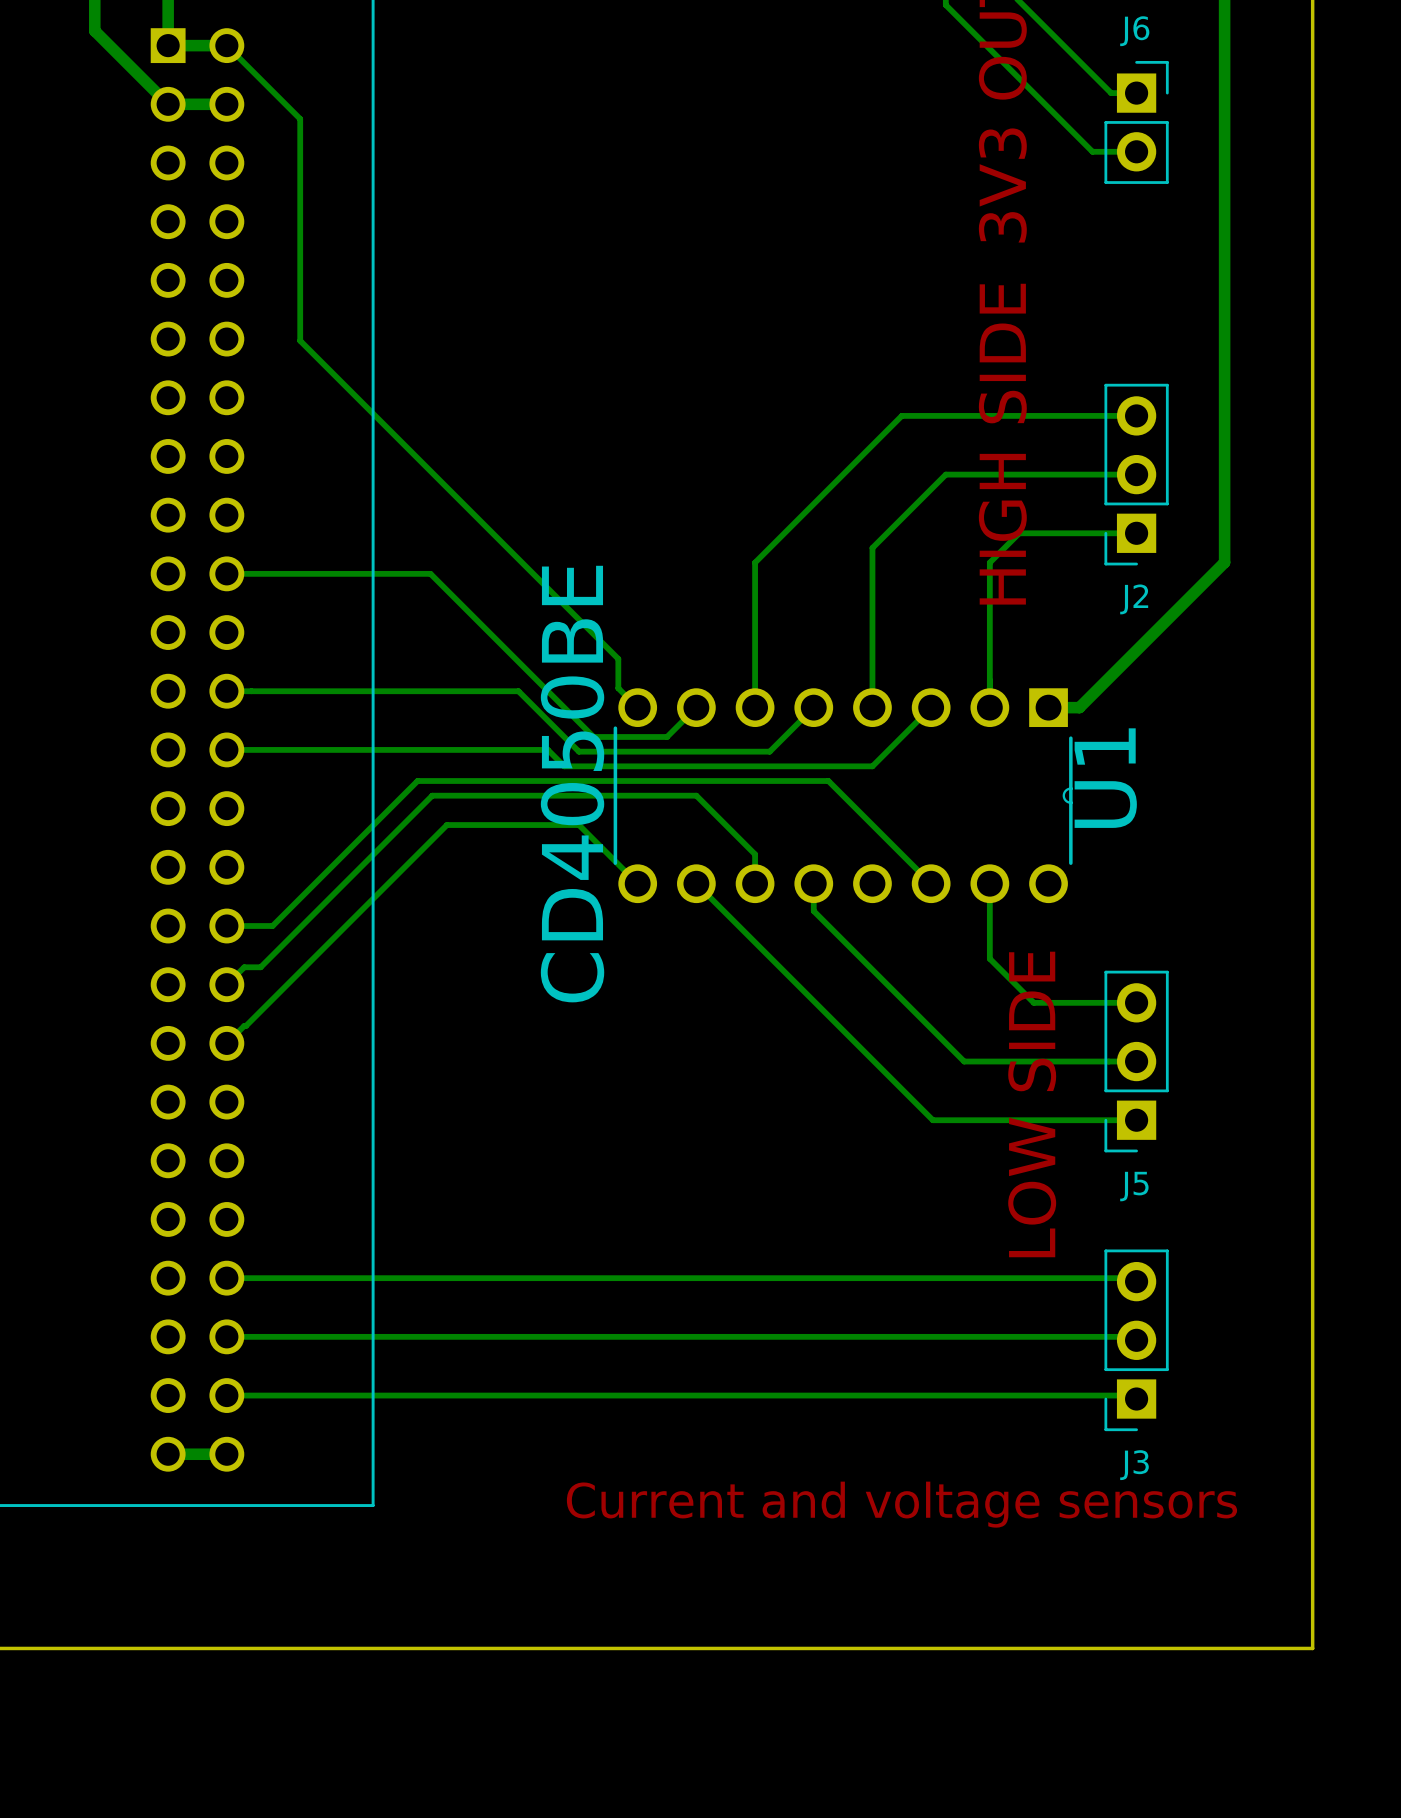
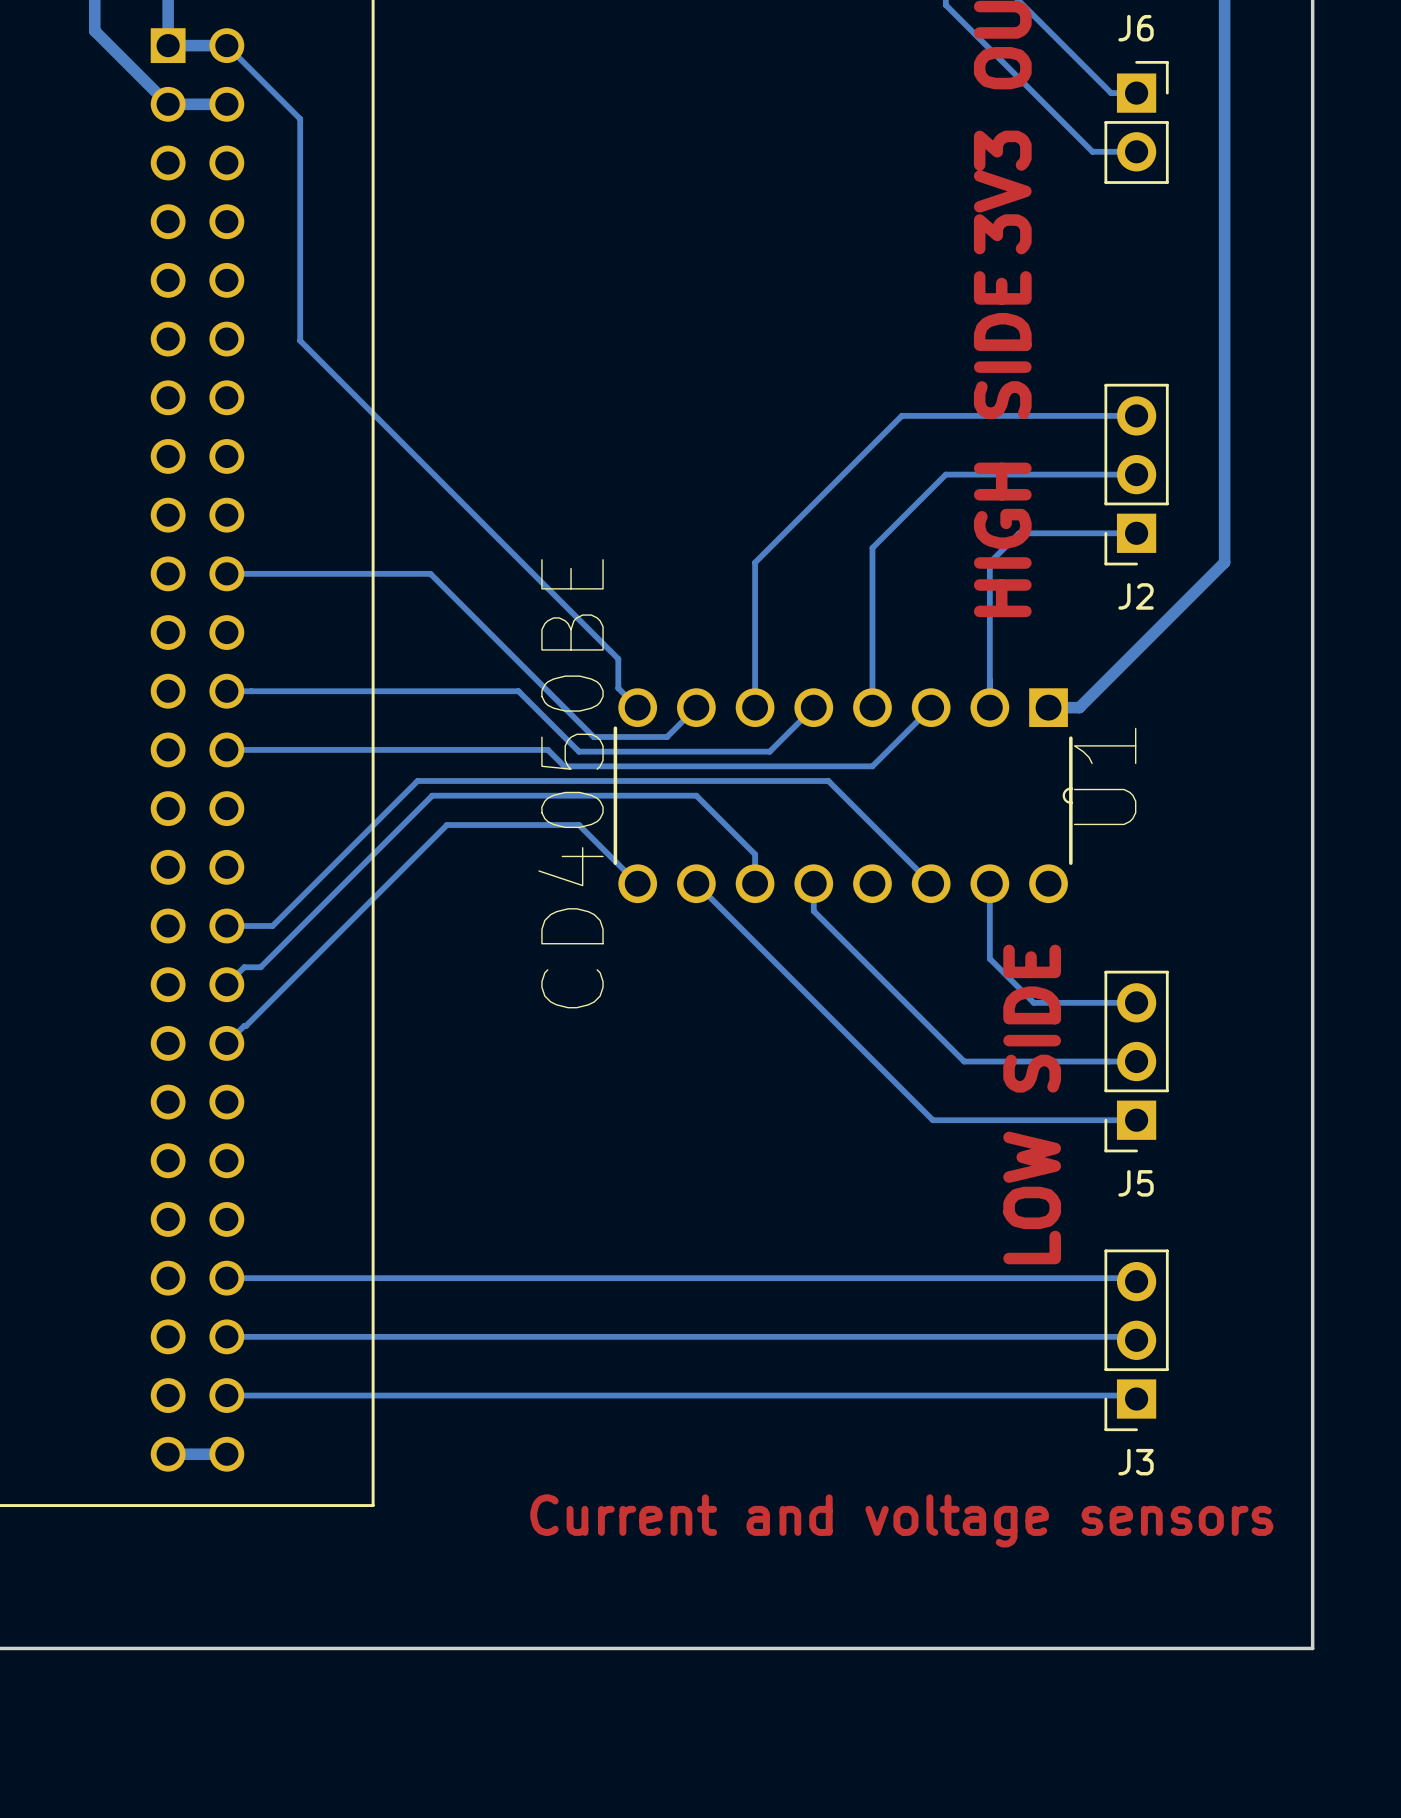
text position: Current and voltage sensors (901, 1504) -> Current and voltage sensors (901, 1520)

